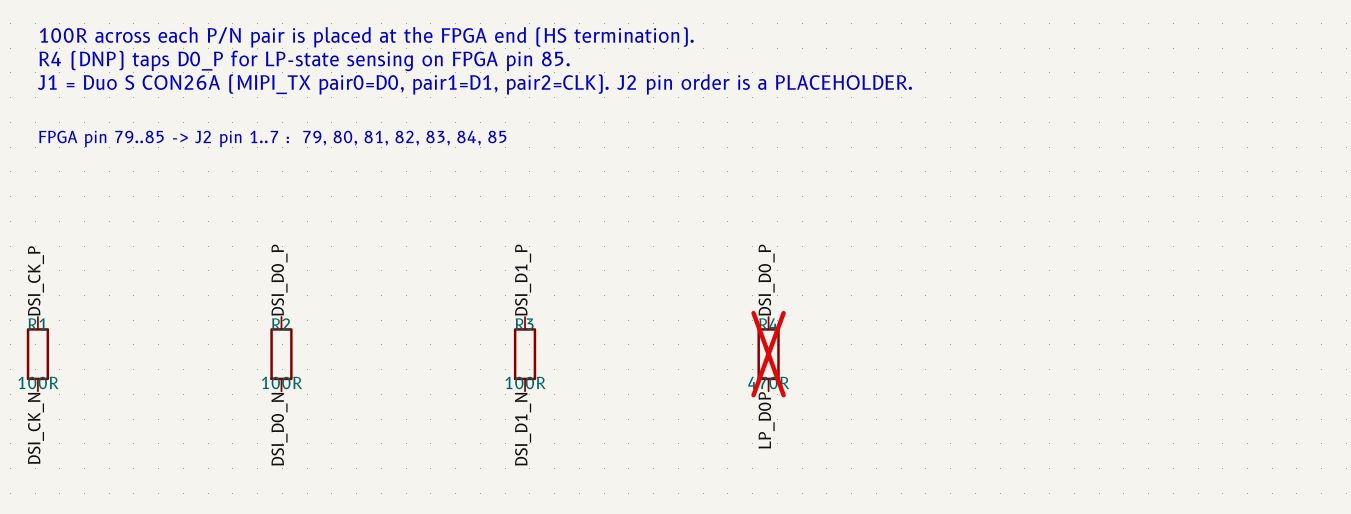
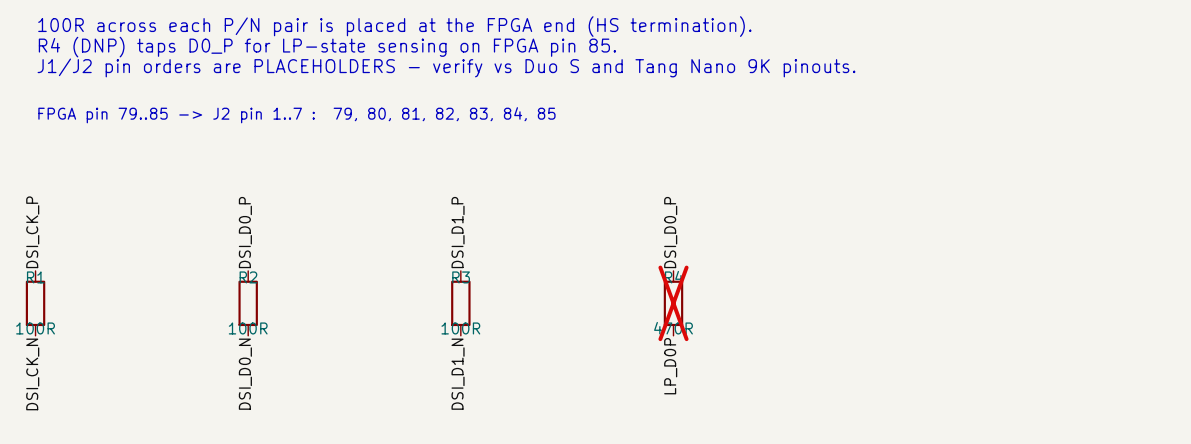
text: J1 = Duo S CON26A (MIPI_TX pair0=D0, pair1=D1, pair2=CLK). J2 pin order is a PLACEHOLDER. (474, 84) -> J1/J2 pin orders are PLACEHOLDERS - verify vs Duo S and Tang Nano 9K pinouts. (446, 67)

